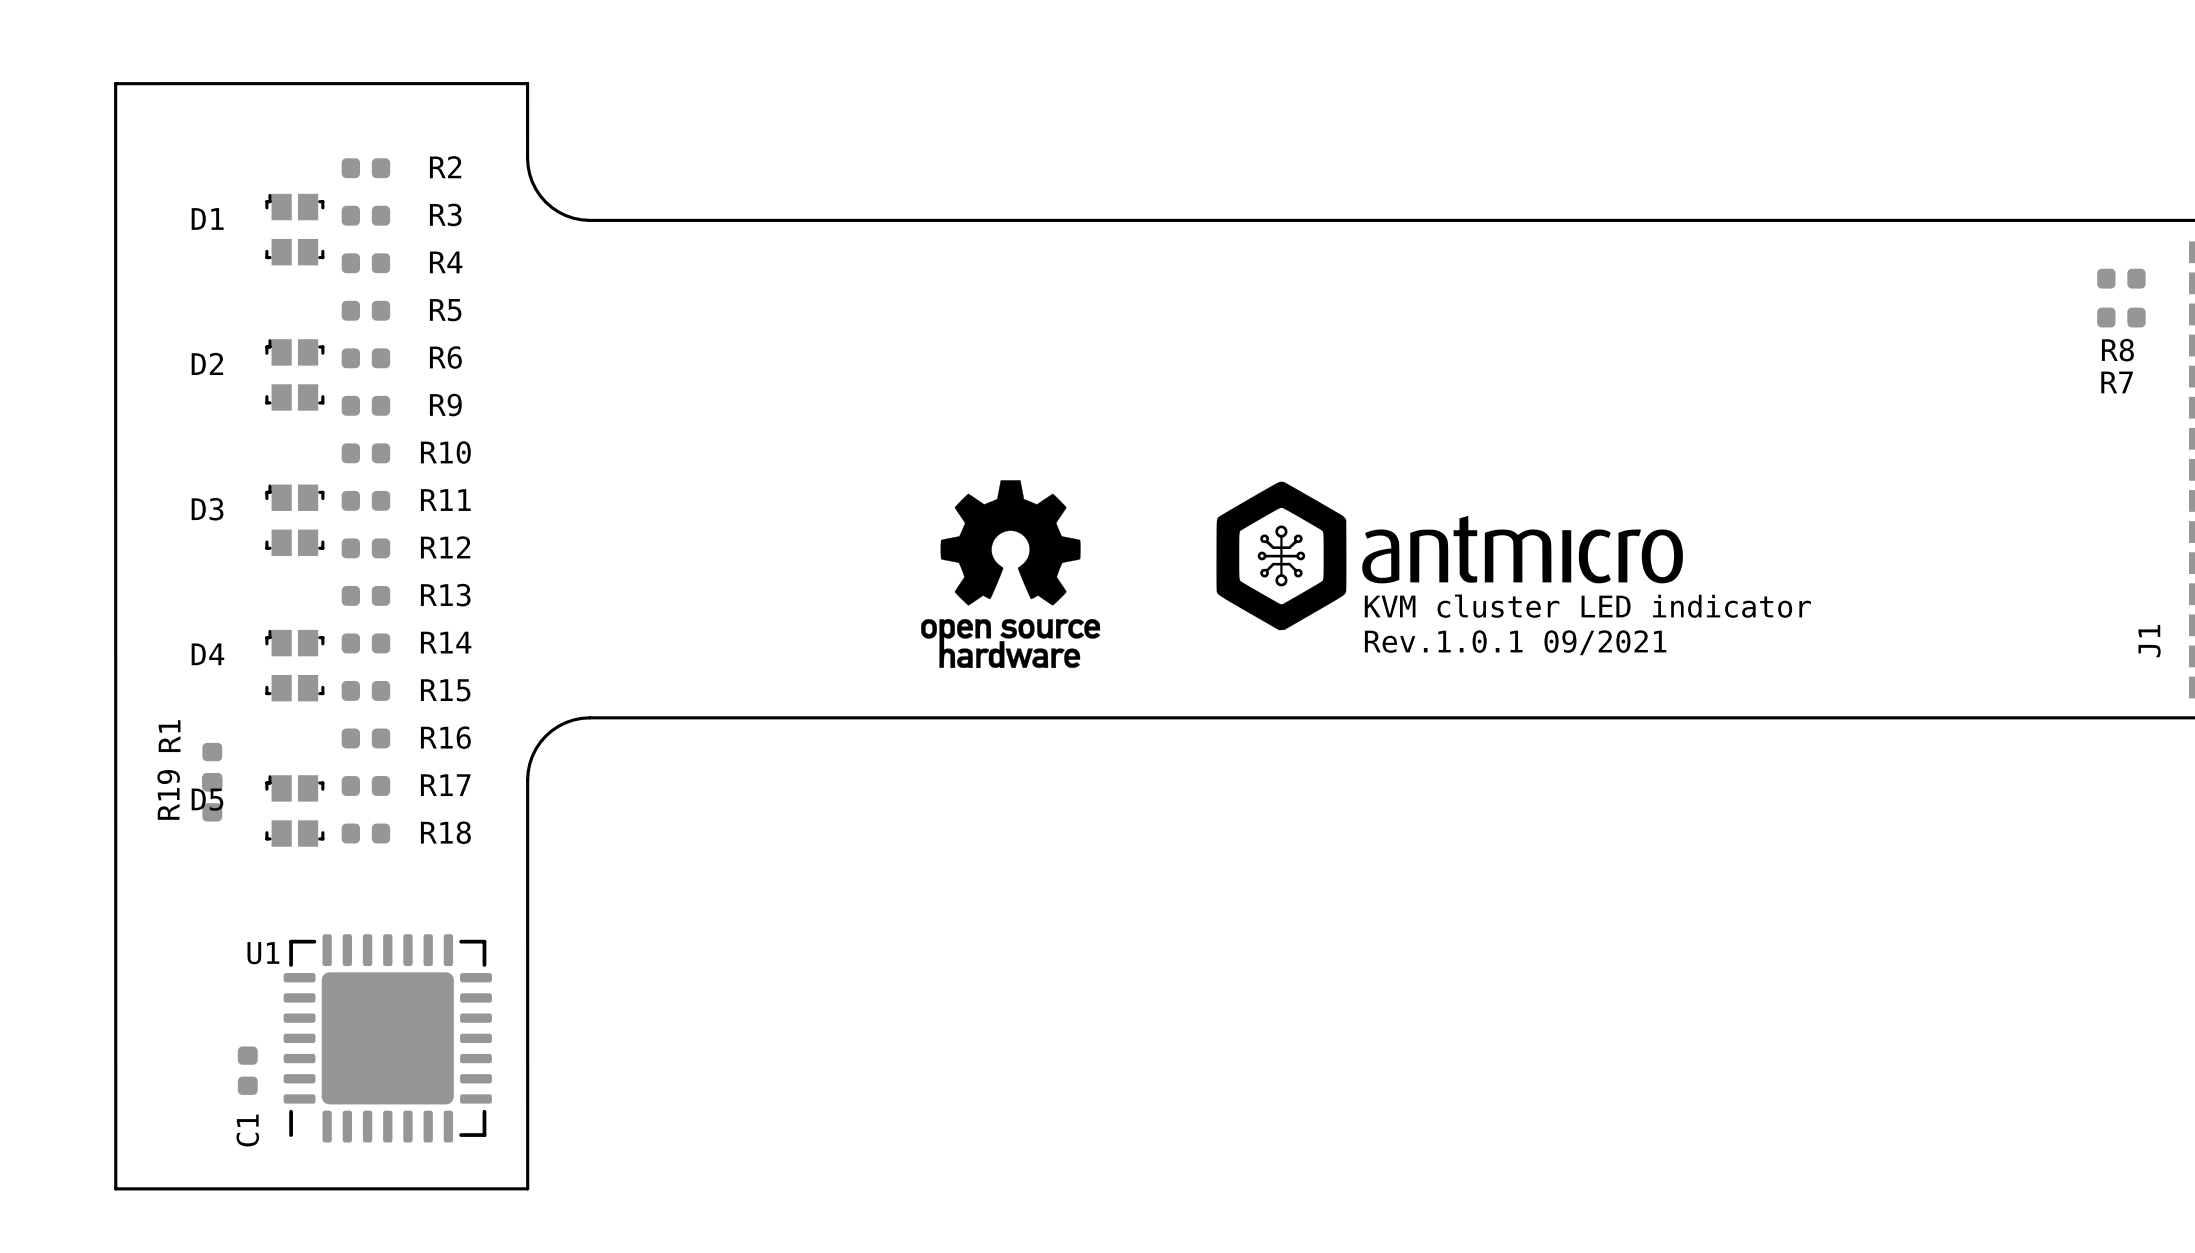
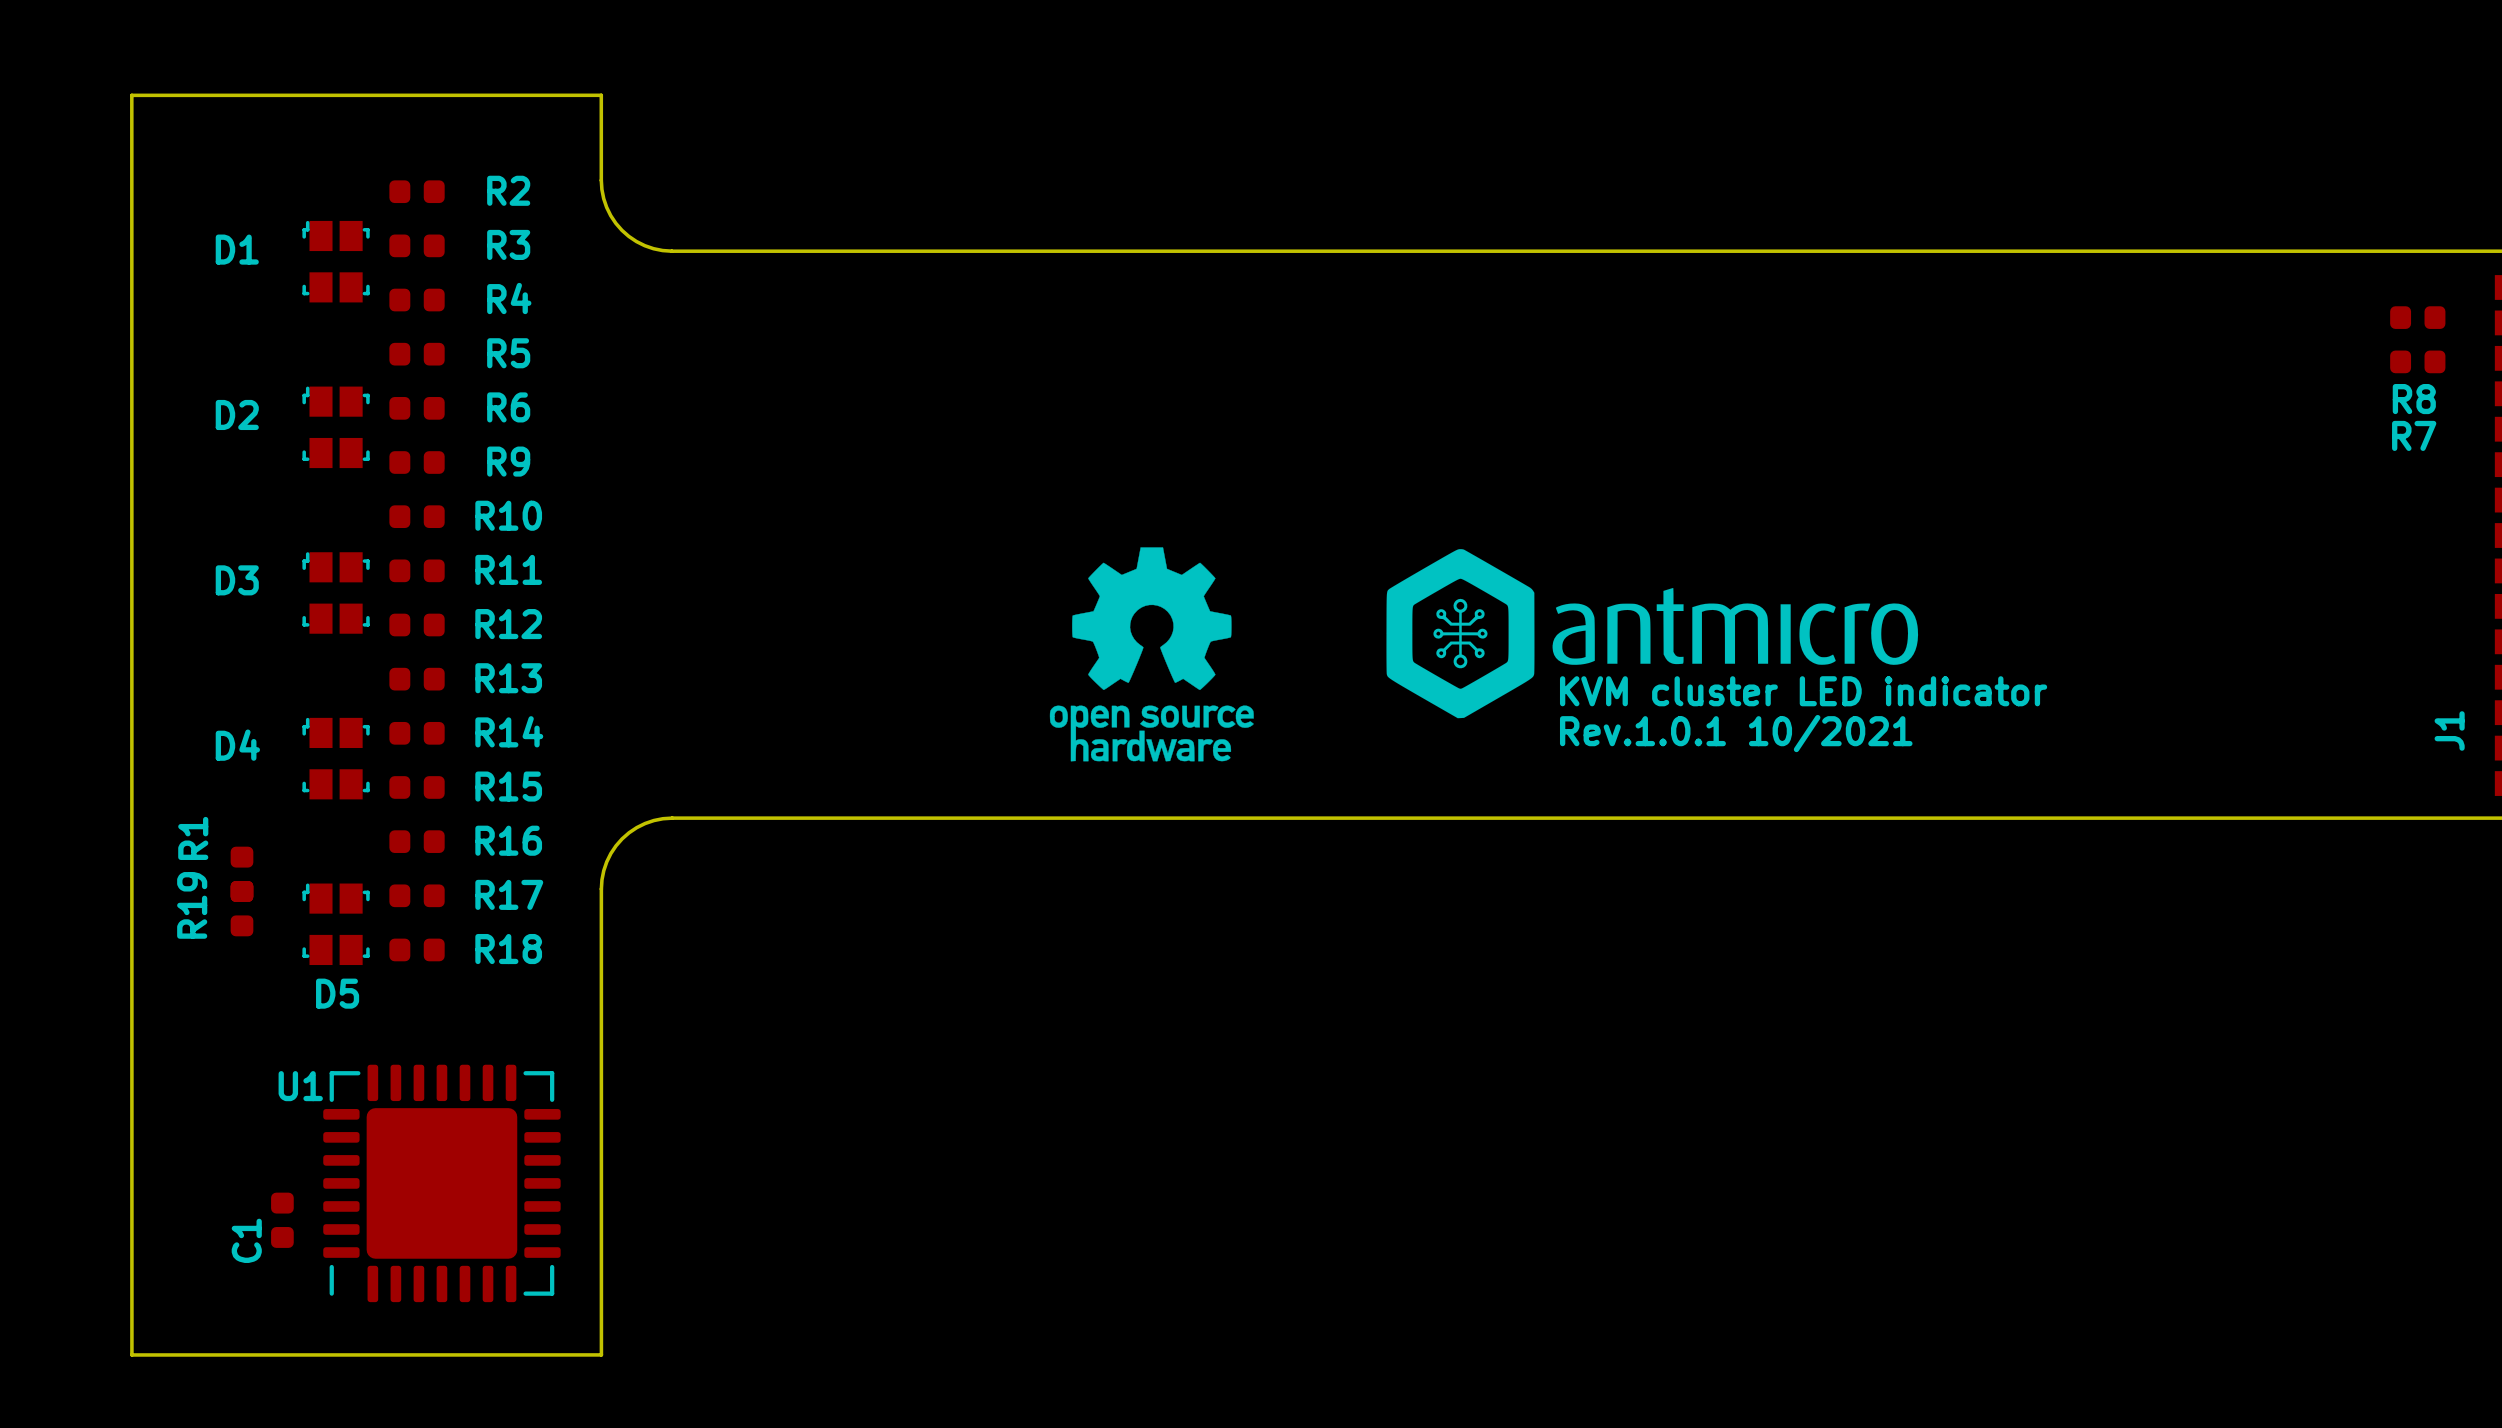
text: Rev.1.0.1 09/2021 (1515, 642) -> Rev.1.0.1 10/2021 (1736, 733)
D5 name position: D5 (207, 799) -> D5 (337, 993)
C1 name position: C1 (247, 1130) -> C1 (246, 1240)

